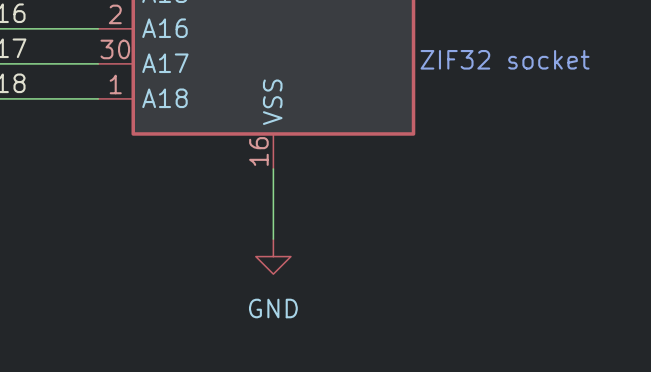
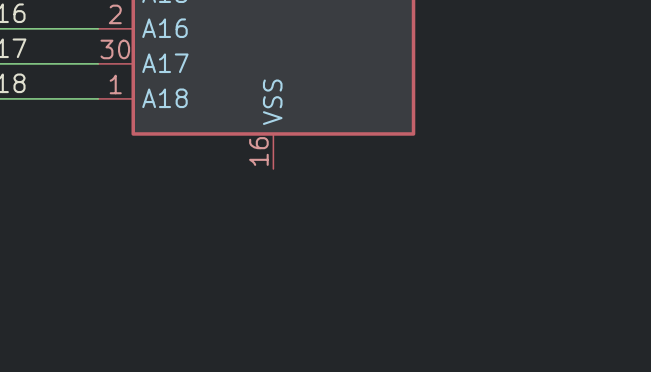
text: ZIF32 socket (505, 59) -> none
wire: (273, 169) (273, 239) -> none
power symbol: GND (273, 256) -> none

